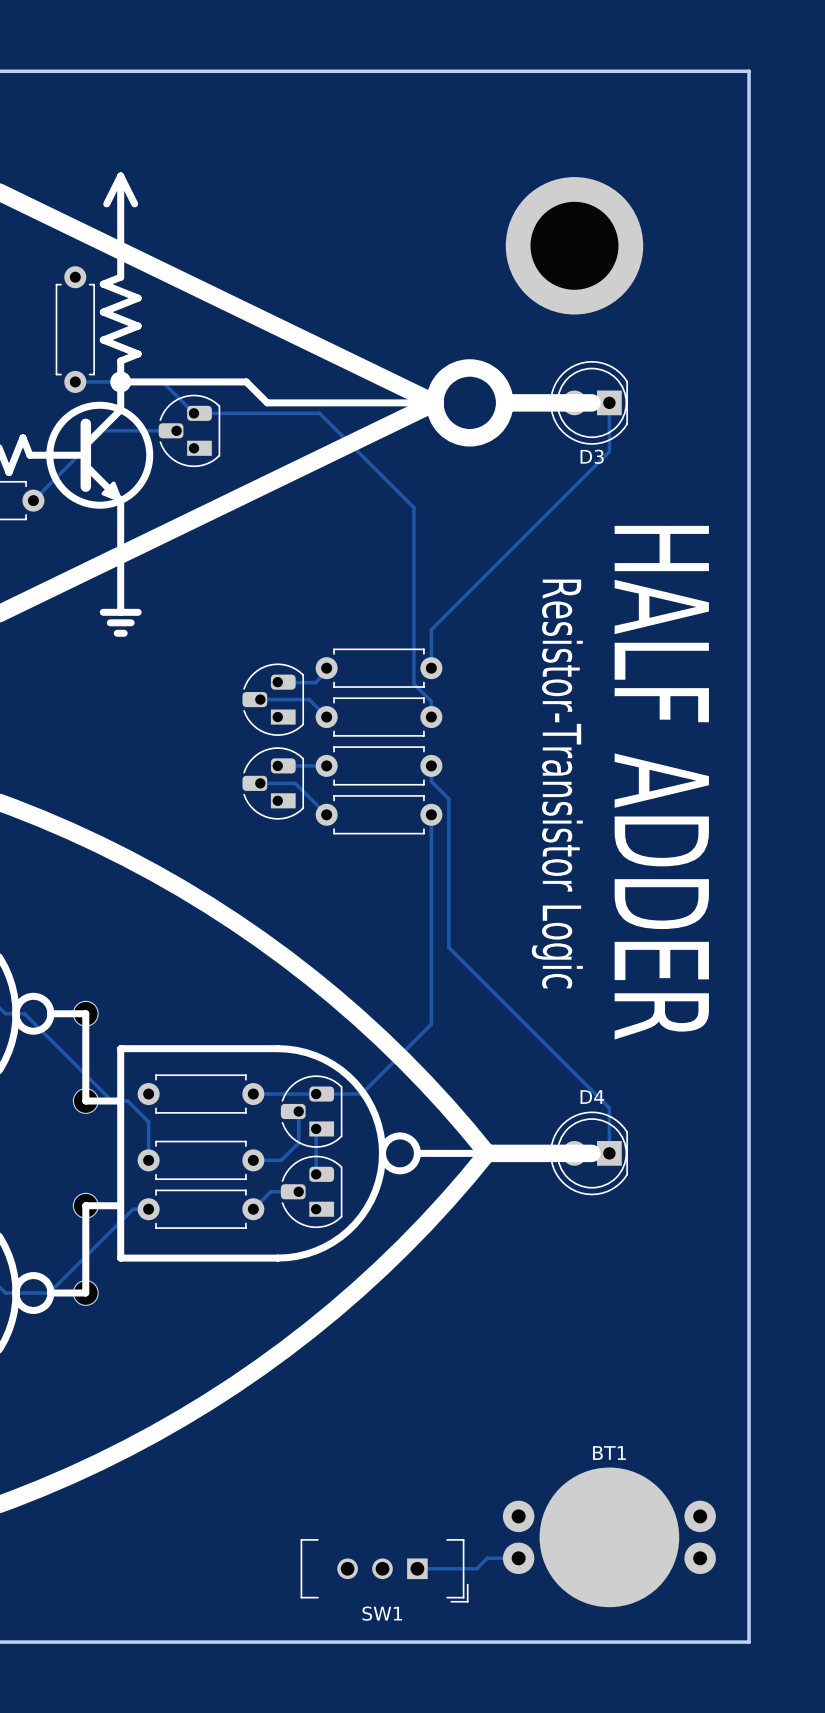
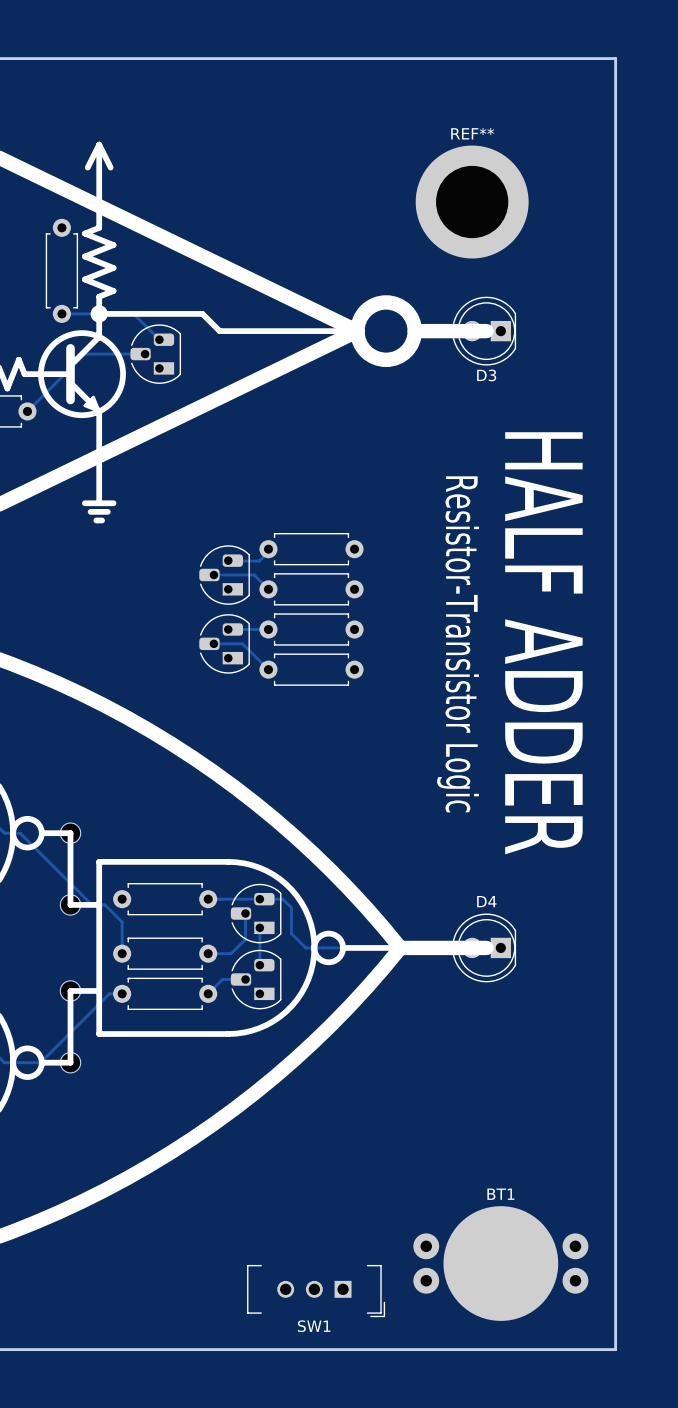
REF** name: none -> REF** (472, 133)
track: (609, 402) (609, 451) (431, 629) (431, 668) -> none
track: (194, 413) (319, 413) (413, 507) (413, 684) (431, 701) (431, 717) -> none
track: (431, 765) (431, 781) (448, 798) (448, 947) (609, 1108) (609, 1153) -> none
track: (431, 814) (431, 1024) (361, 1094) (344, 1094) -> (414, 947) (305, 947) (291, 933) (291, 907) (282, 899)
track: (518, 1558) (487, 1558) (476, 1568) (417, 1568) -> none

